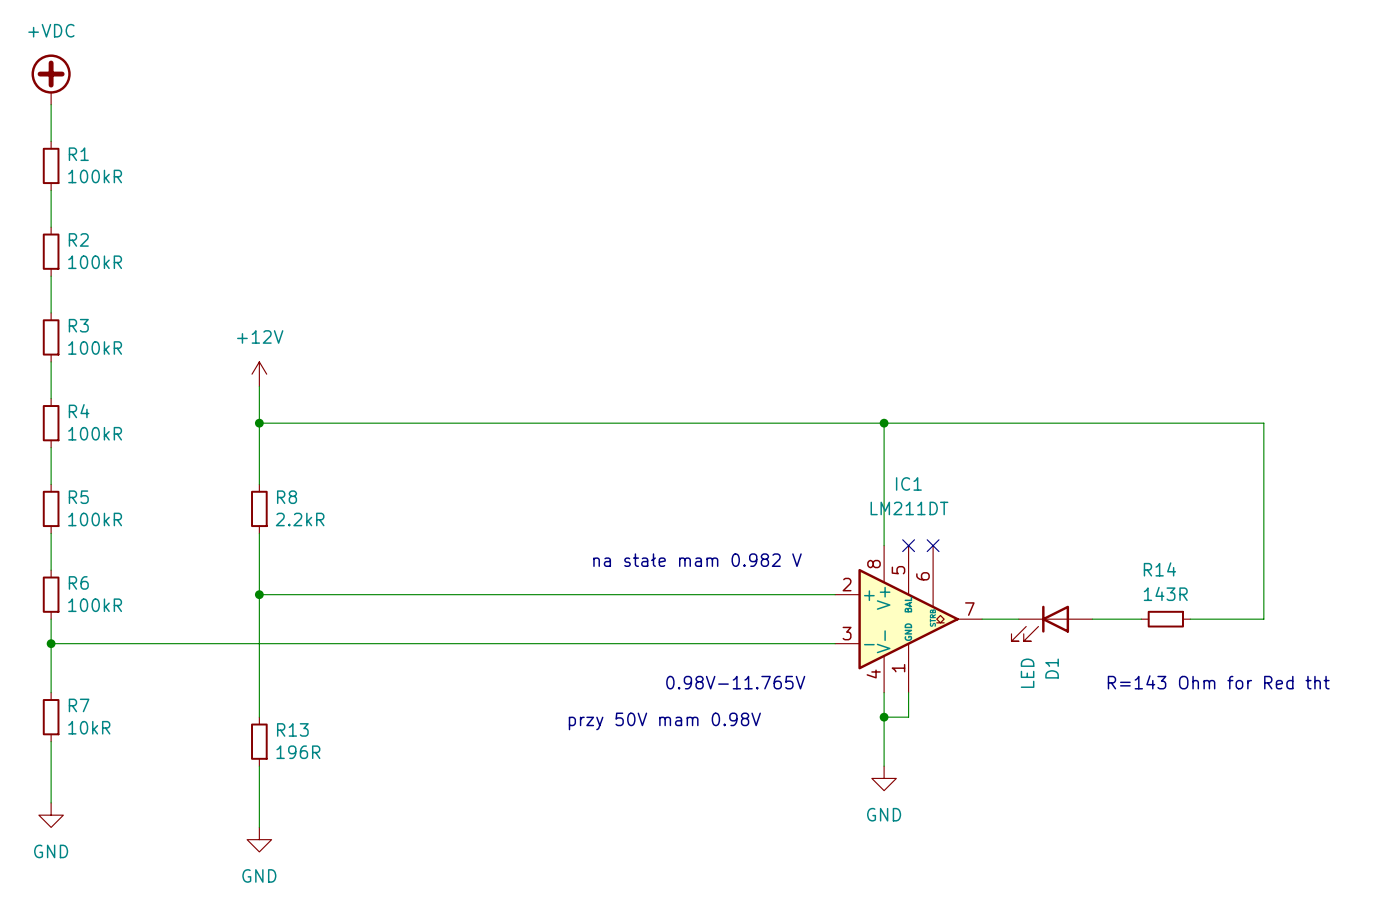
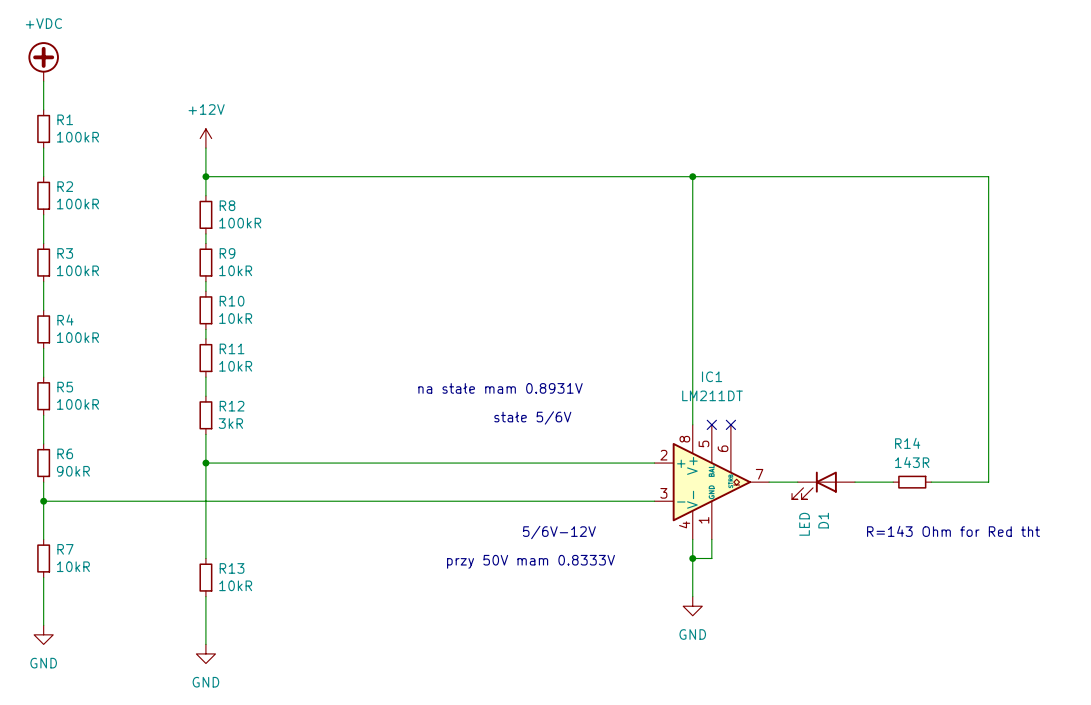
wire: none -> (205, 148) (205, 195)
junction: none -> (205, 176)
wire: none -> (692, 176) (692, 329)
junction: none -> (692, 176)
wire: none -> (205, 233) (205, 243)
R9: none -> 10kR (205, 262)
power symbol position: +12V (259, 374) -> +12V (205, 138)
wire: (259, 386) (259, 423) (1263, 423) -> (205, 176) (988, 176) (988, 329)
R10: none -> 10kR (205, 310)
junction: (259, 423) -> none
junction: (884, 423) -> none
wire: (259, 435) (259, 484) -> (205, 396) (205, 377)
R11: none -> 10kR (205, 358)
text: none -> na stałe mam 0.8931V (500, 388)
R8 position: (259, 508) -> (205, 214)
R8 value: 2.2kR (300, 519) -> 100kR (240, 223)
wire: (259, 533) (259, 557) -> none
R12: none -> 3kR (205, 415)
text: none -> stałe 5/6V (532, 417)
text: na stałe mam 0.982 V (697, 560) -> none
R6 value: 100kR (95, 605) -> 90kR (73, 471)
text: 0.98V-11.765V (735, 682) -> 5/6V-12V (559, 532)
text: przy 50V mam 0.98V (664, 721) -> przy 50V mam 0.8333V (531, 561)
R13 value: 196R (298, 752) -> 10kR (235, 585)

